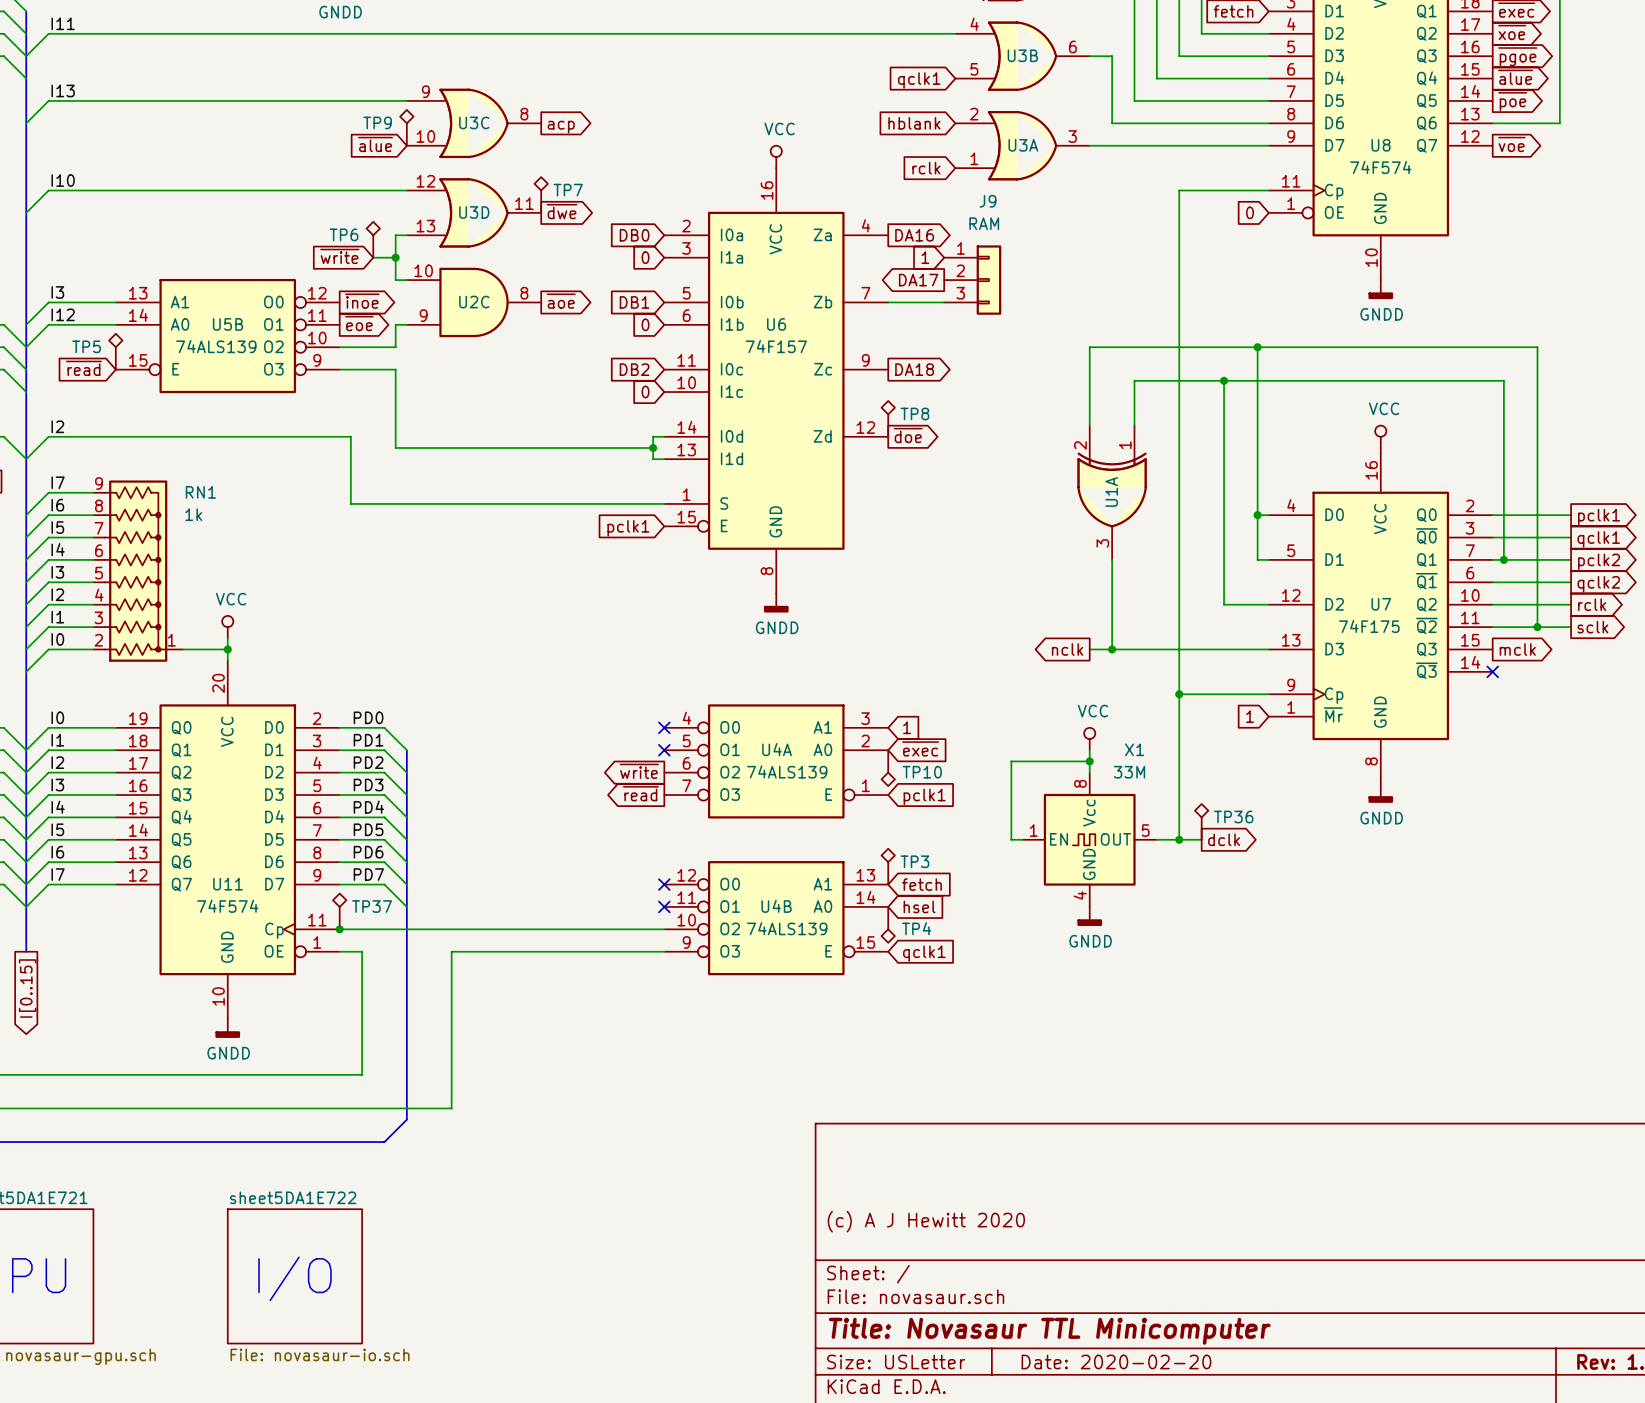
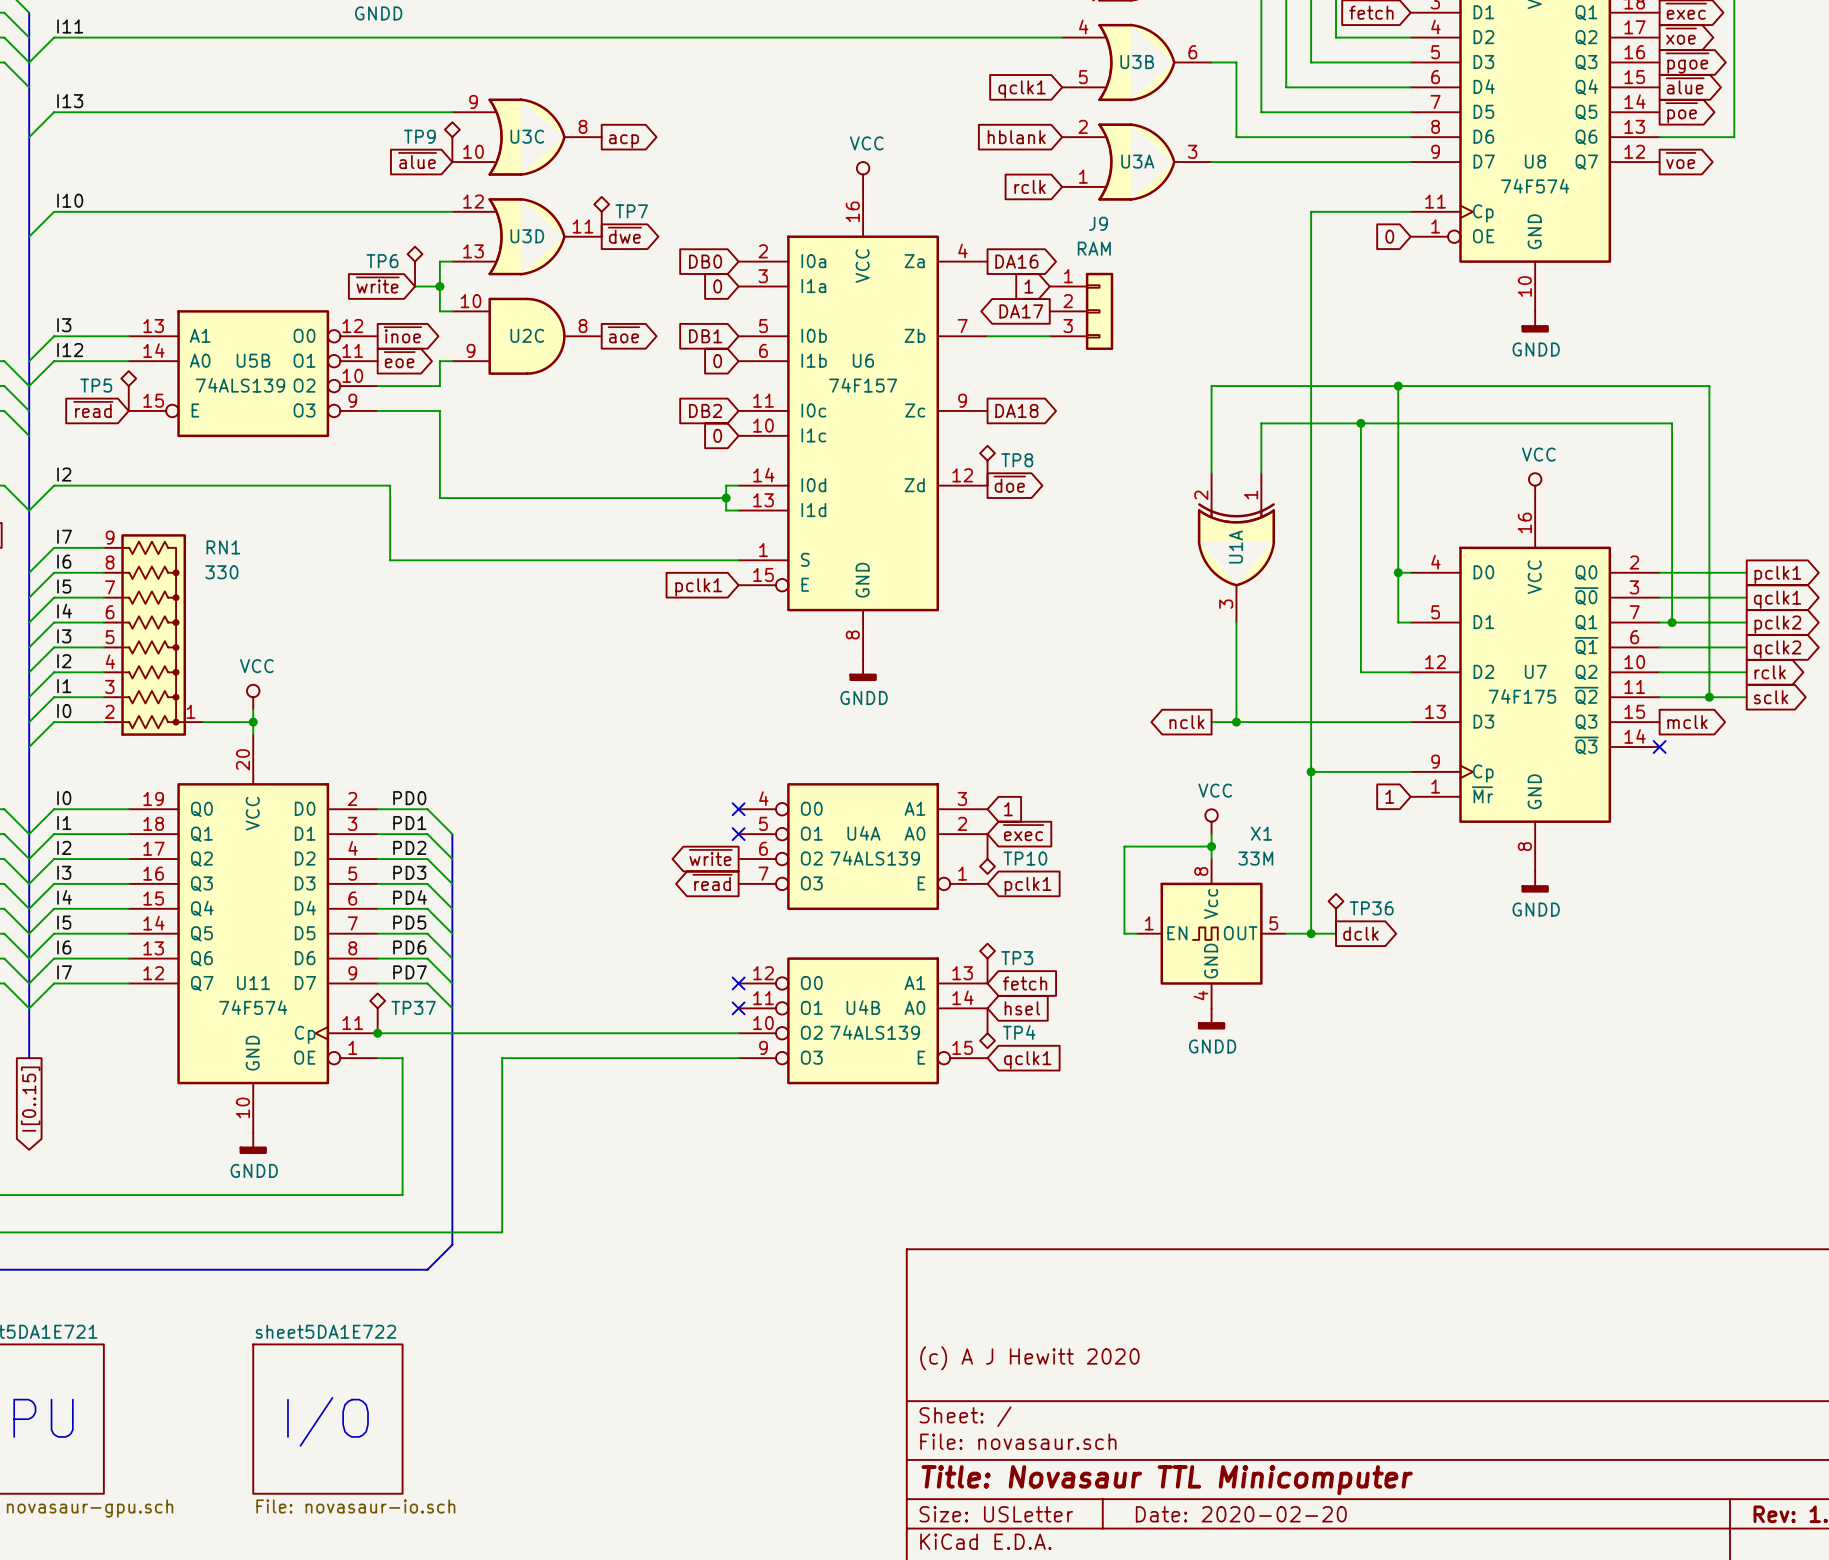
RN1 value: 1k (193, 514) -> 330 (221, 572)

